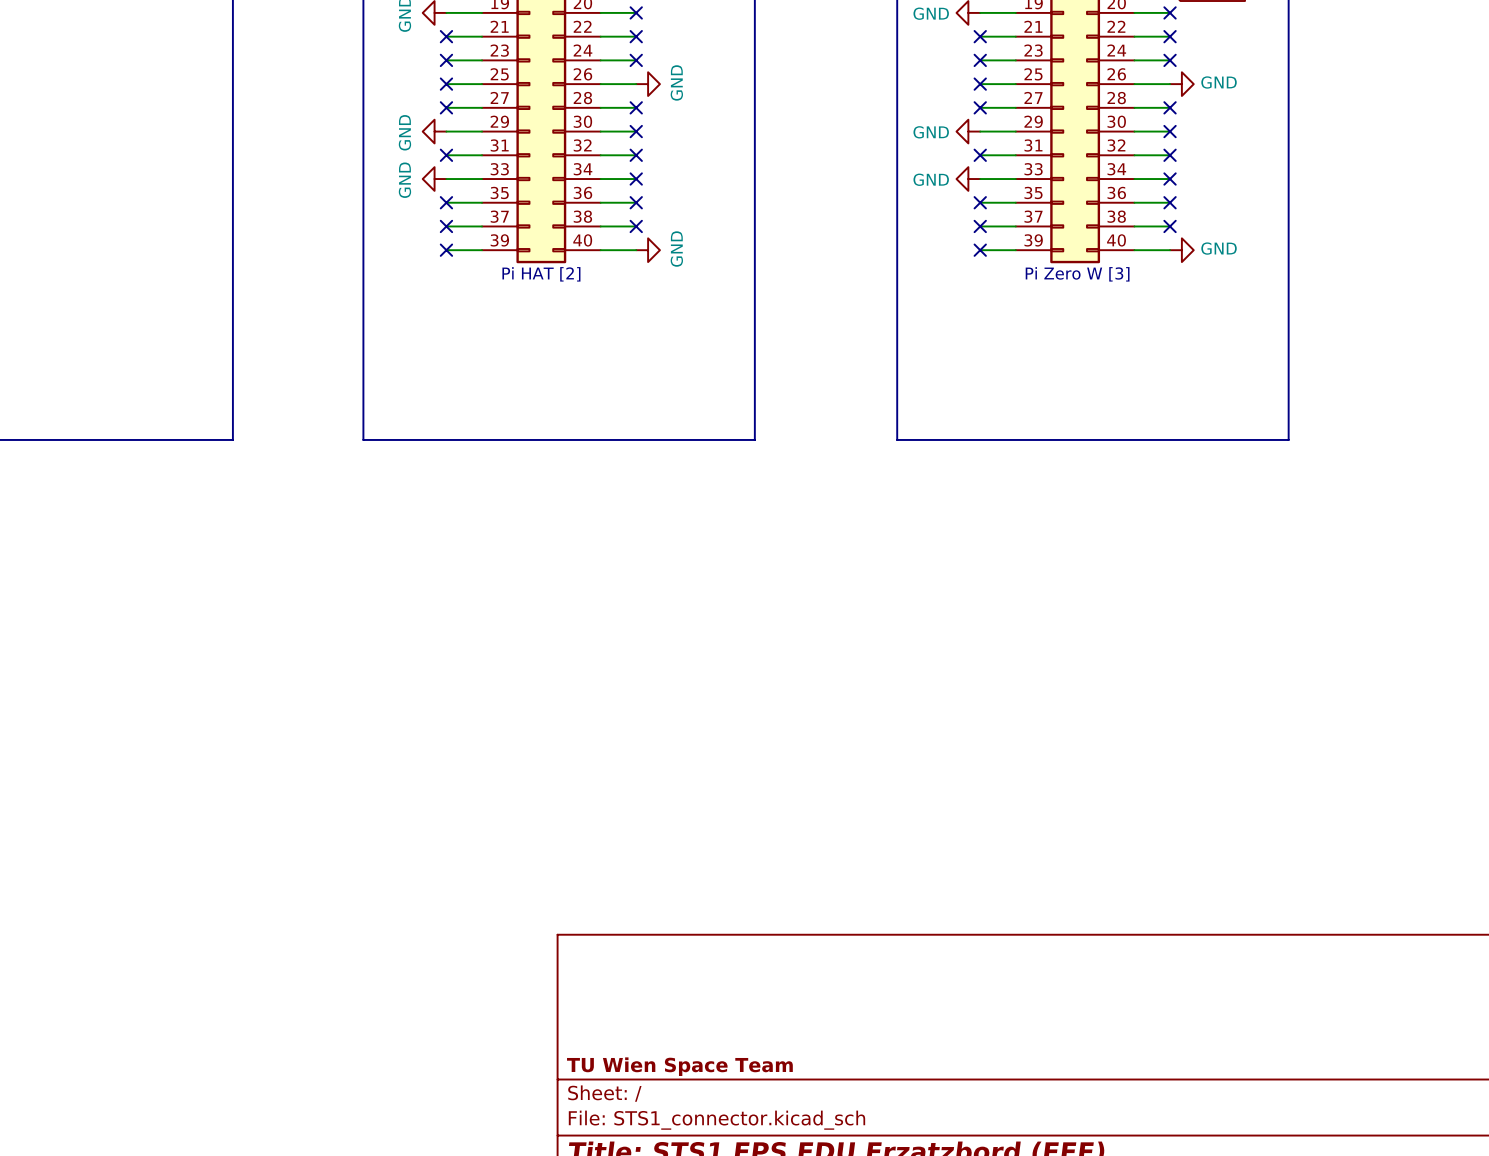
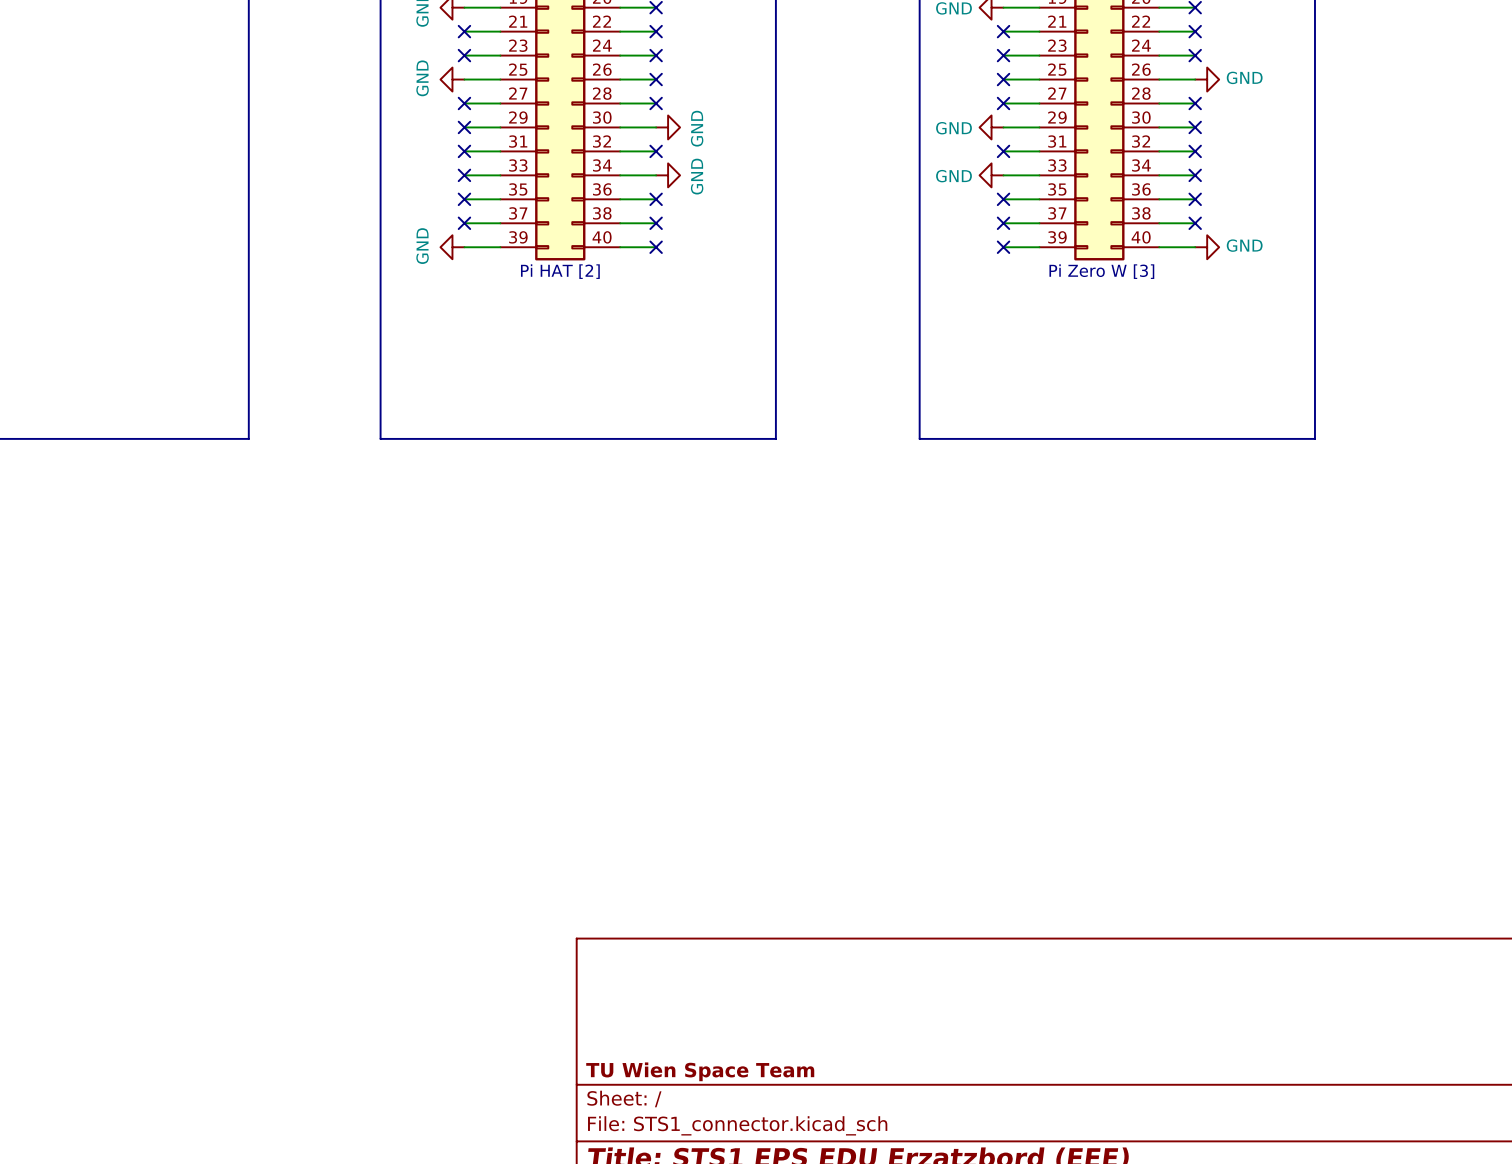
power symbol: none -> GND (452, 79)
no-connect mark: (446, 84) -> none
no-connect mark: none -> (656, 79)
power symbol: GND (648, 84) -> none
power symbol: GND (434, 131) -> none
no-connect mark: none -> (464, 127)
no-connect mark: (636, 131) -> none
power symbol: none -> GND (668, 127)
power symbol: GND (434, 179) -> none
no-connect mark: none -> (464, 175)
no-connect mark: (636, 179) -> none
power symbol: none -> GND (668, 175)
power symbol: none -> GND (452, 247)
no-connect mark: (446, 250) -> none
no-connect mark: none -> (656, 247)
power symbol: GND (648, 250) -> none

